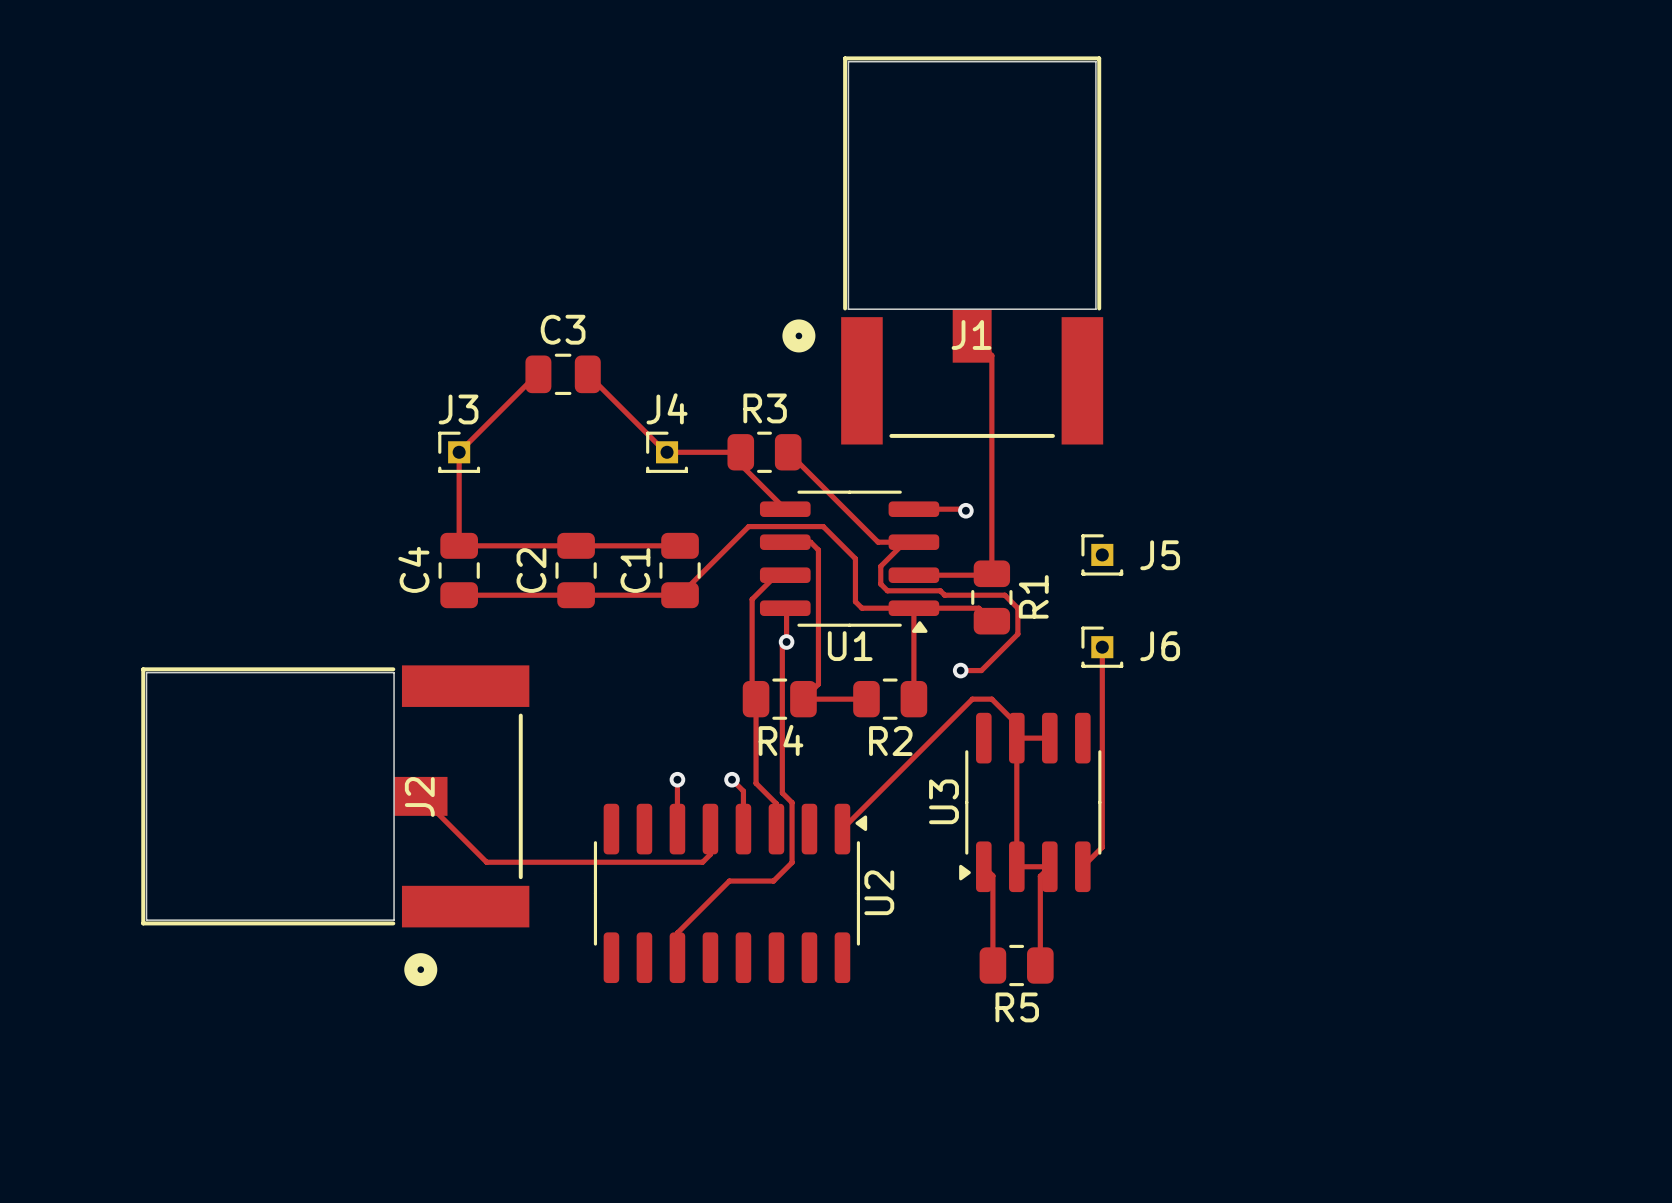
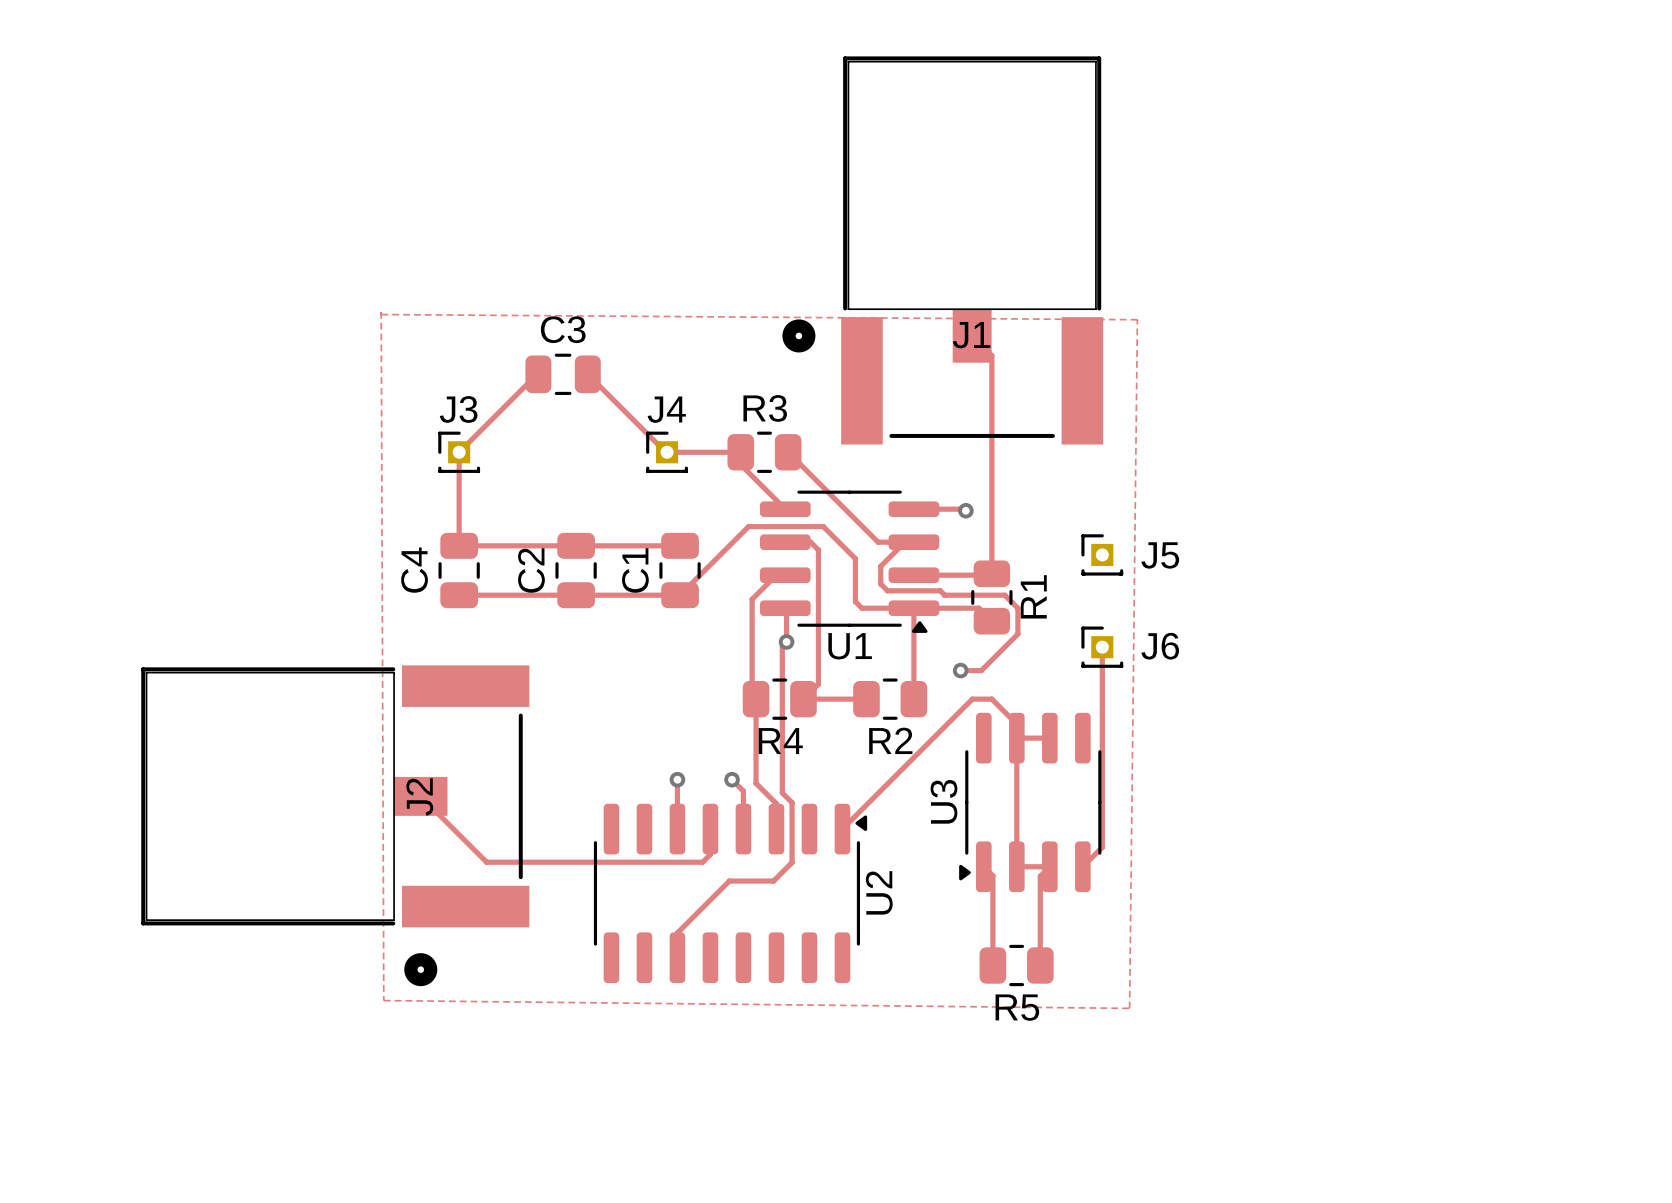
zone outline: none -> (381, 311) (383, 1000) (1129, 1008) (1137, 319) (381, 314) (381, 311)

